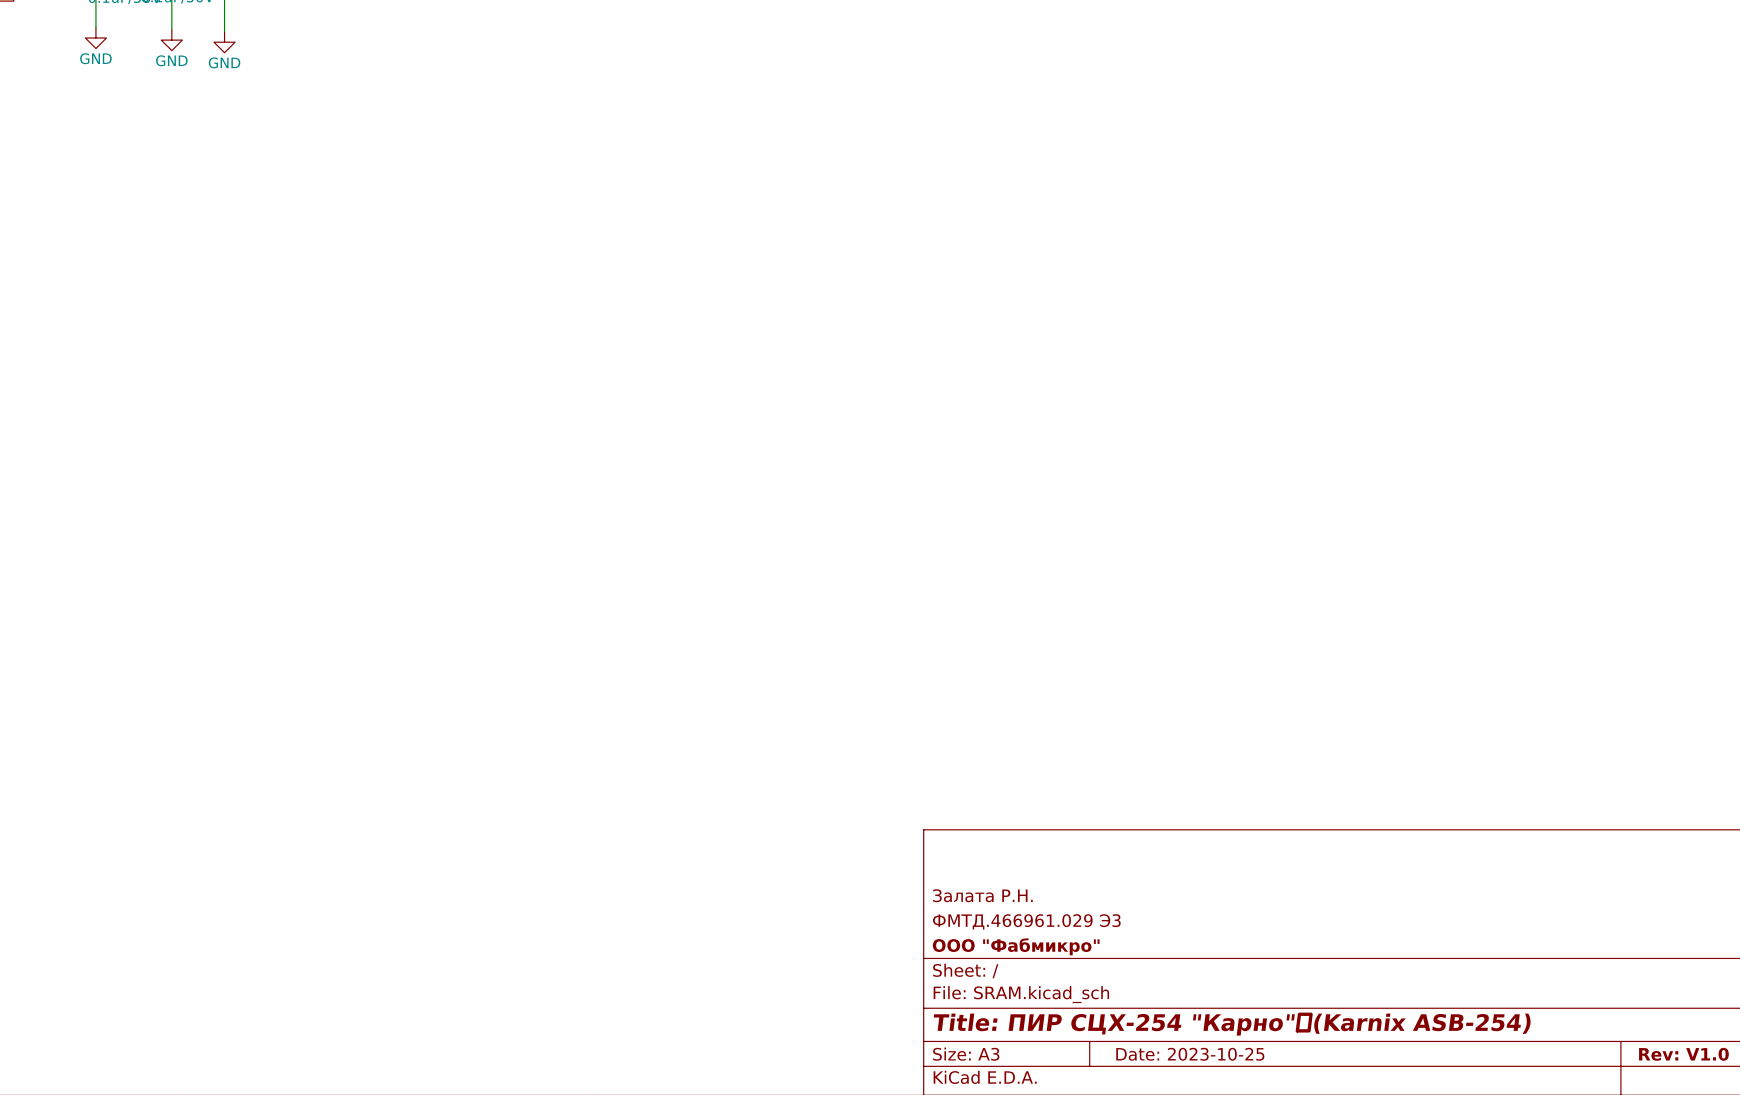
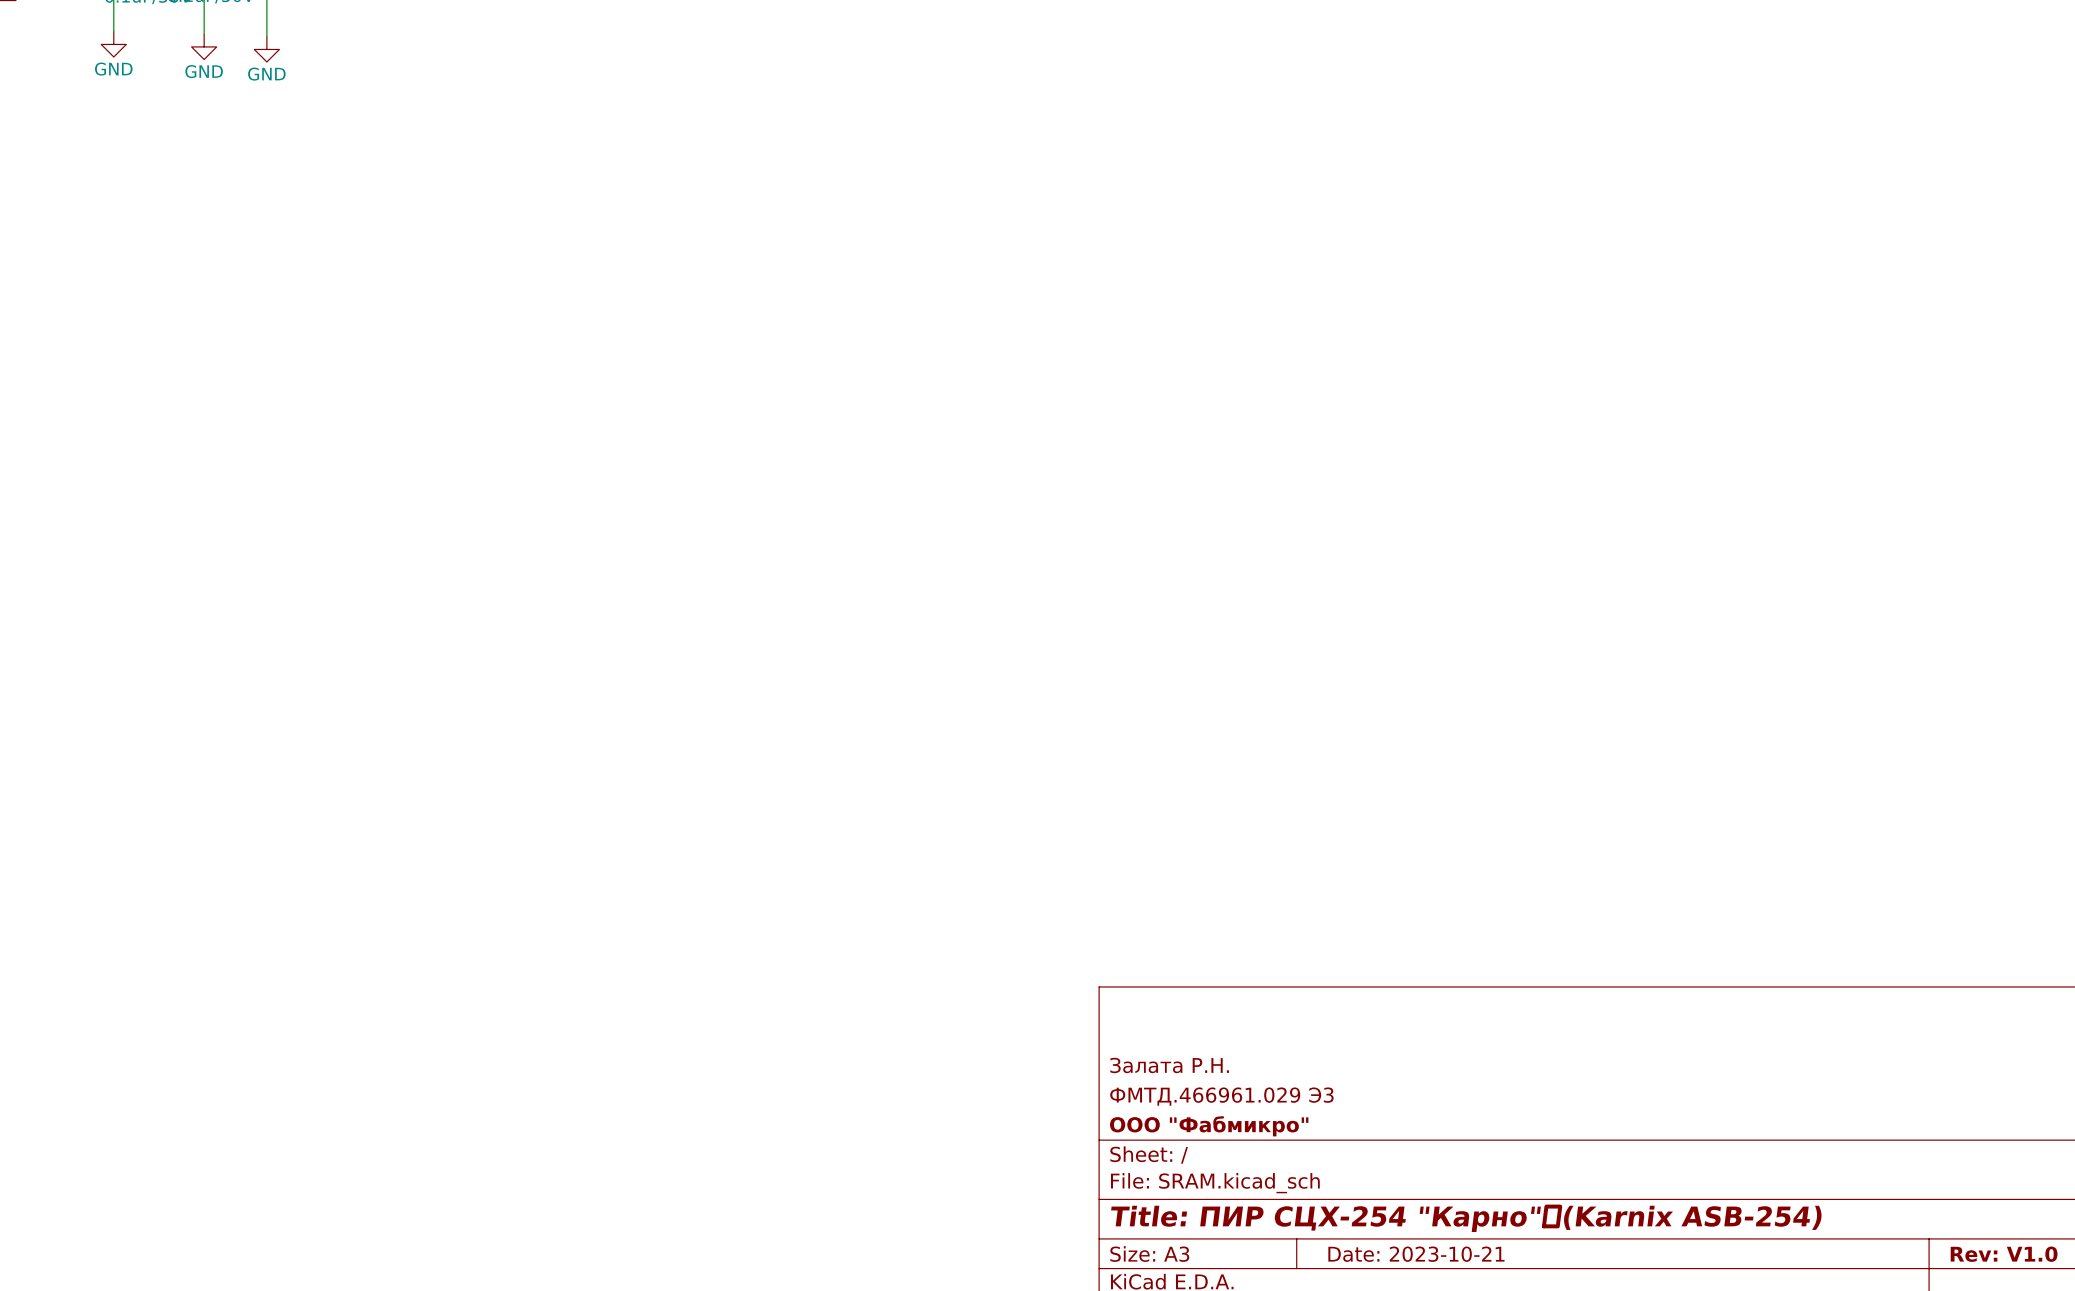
title block: Date: 2023-10-25 (1190, 1054) -> Date: 2023-10-21 (1416, 1254)

